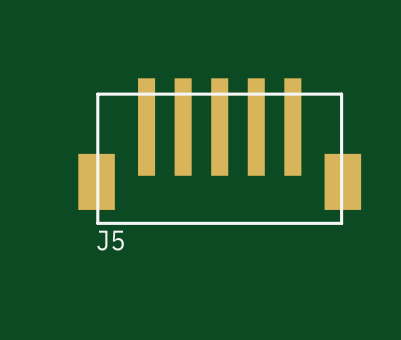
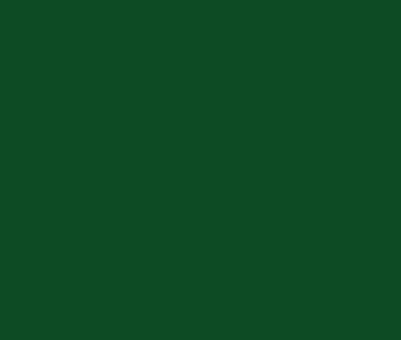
J5: (219, 151) -> none

